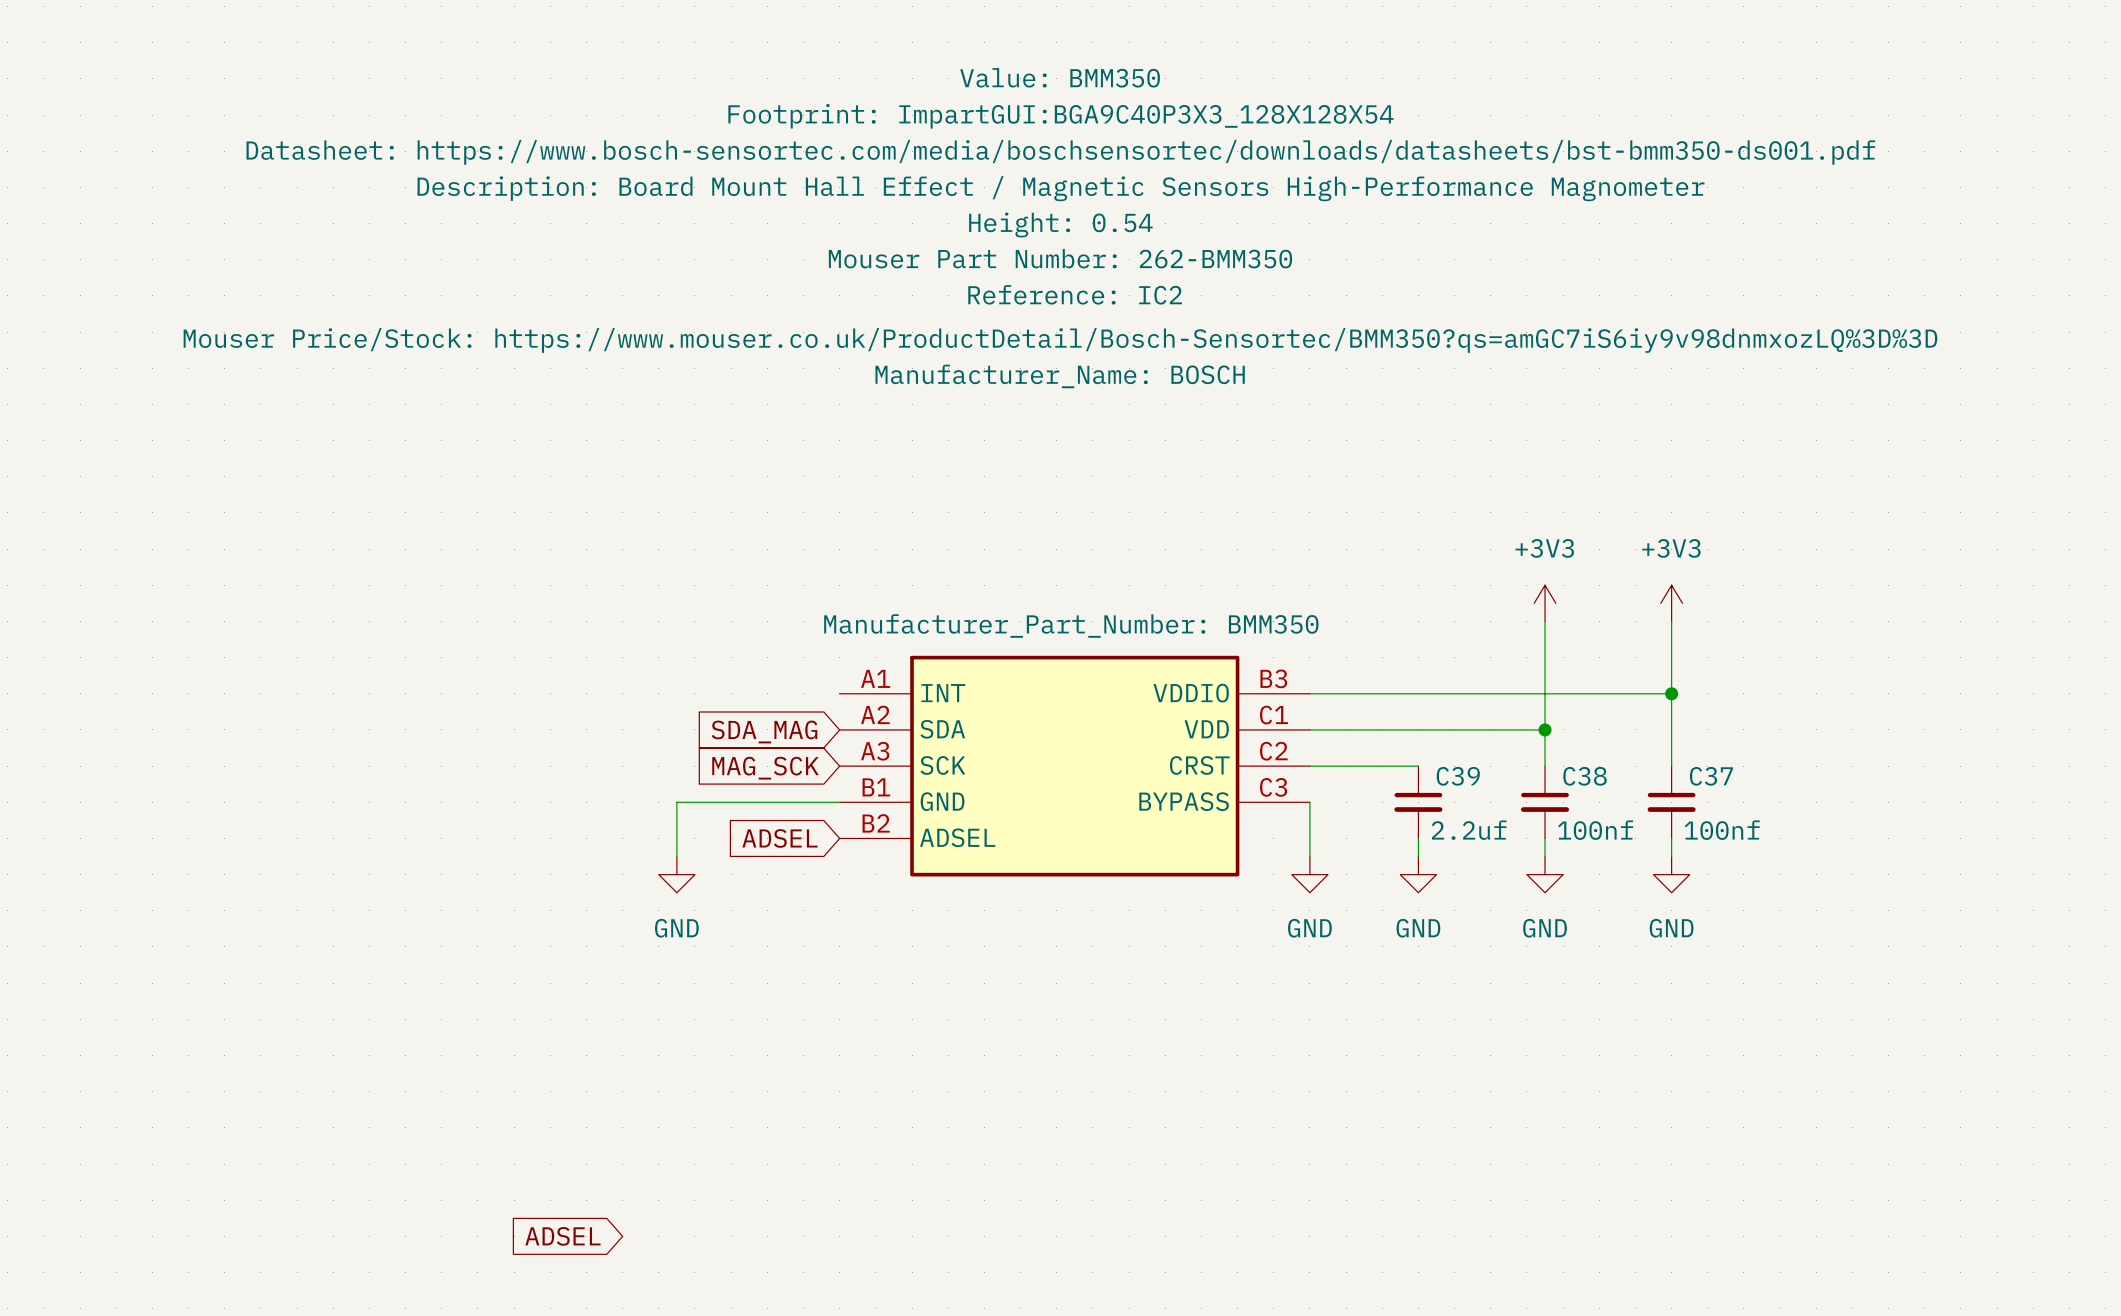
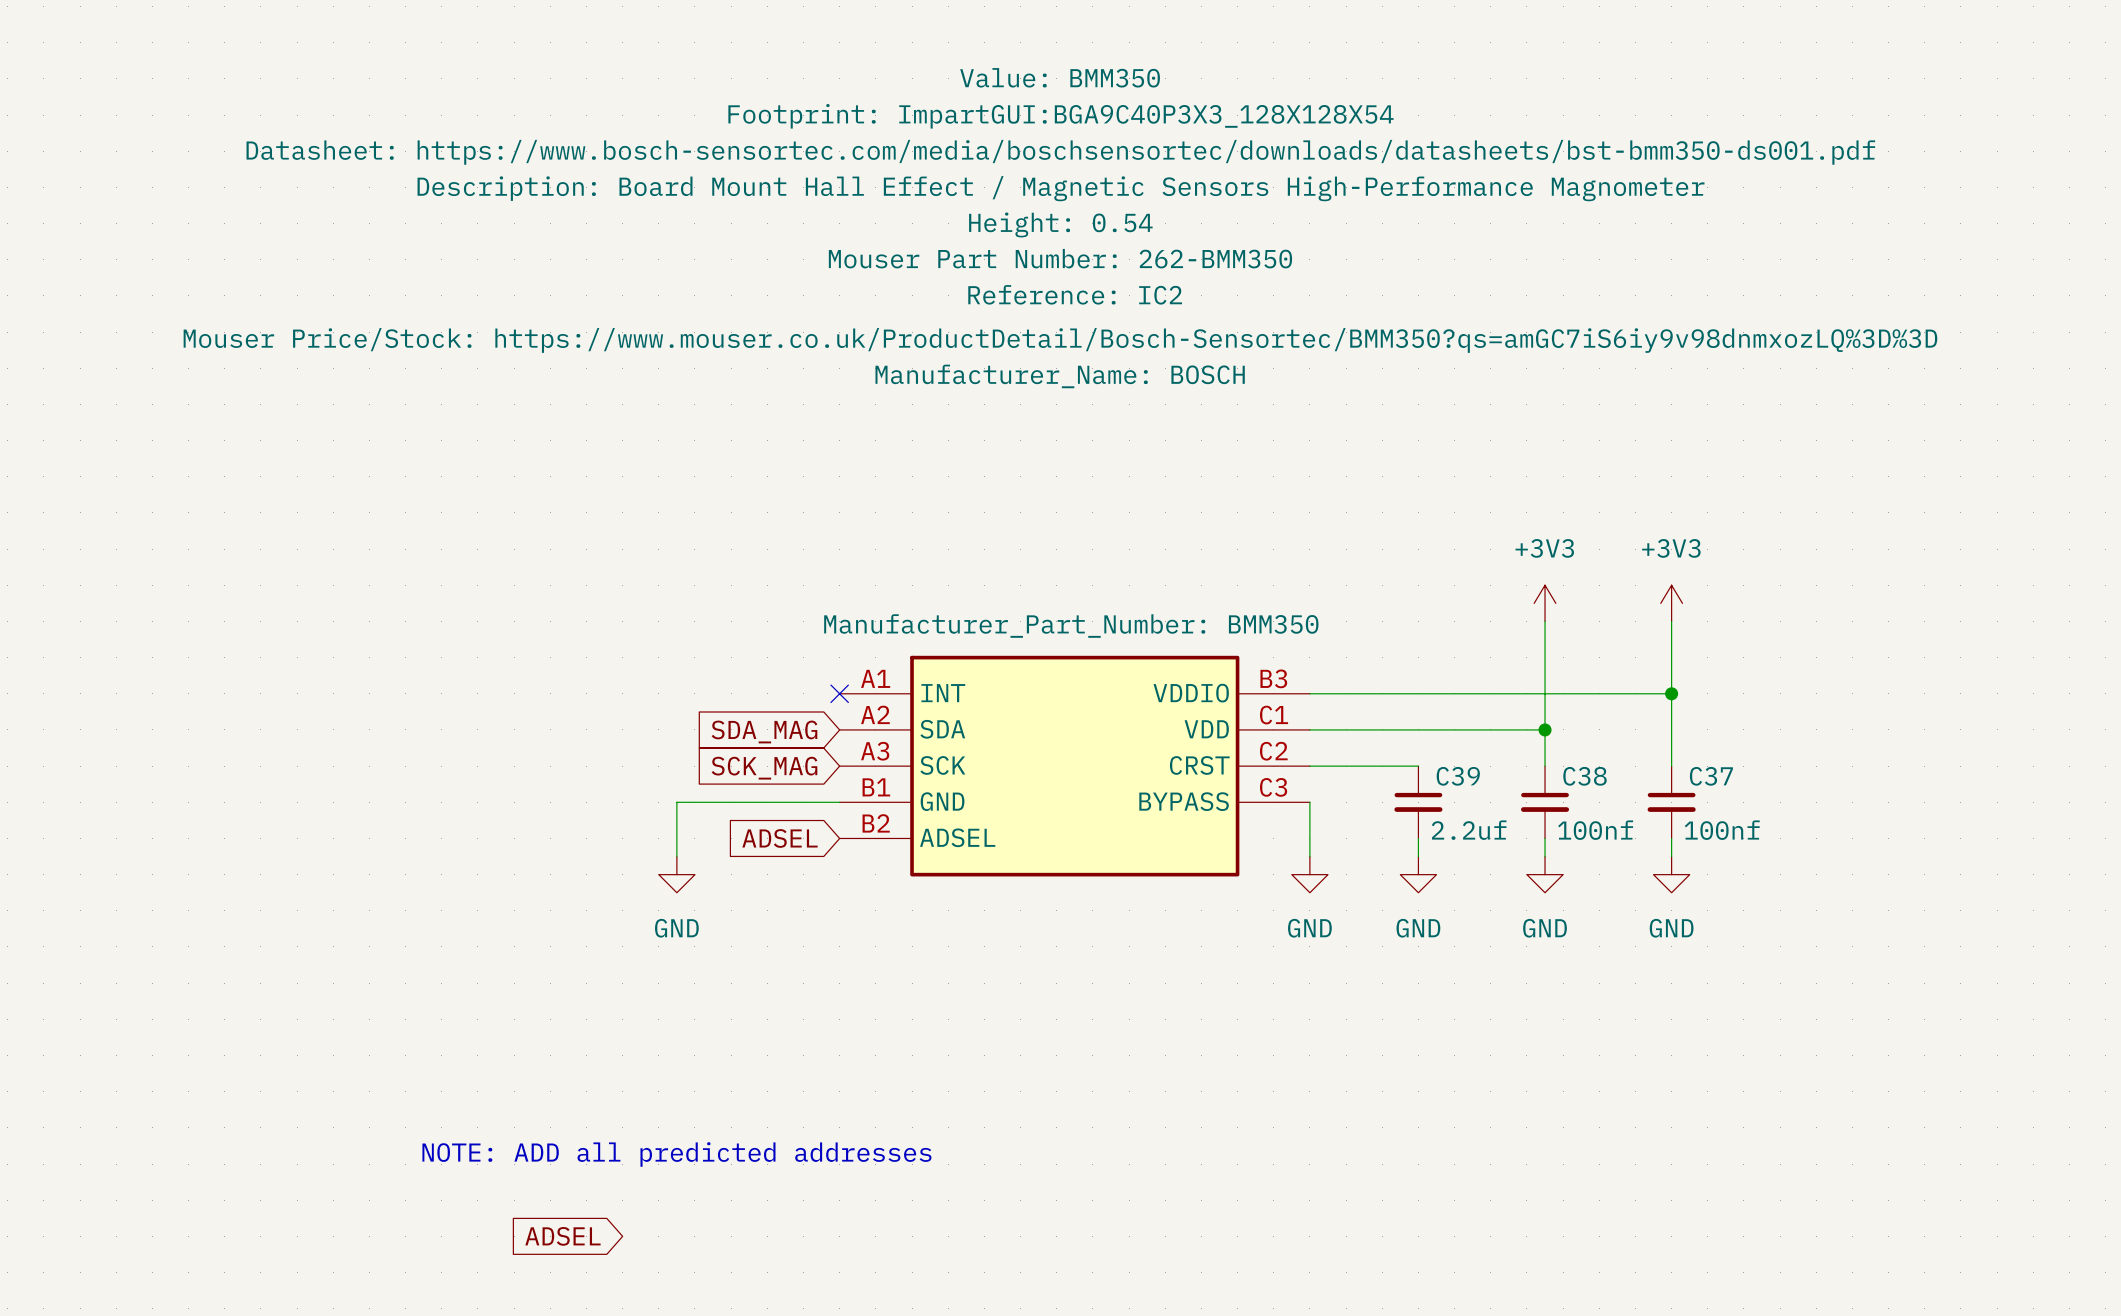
no-connect mark: none -> (839, 693)
global label: MAG_SCK (765, 768) -> SCK_MAG (764, 768)
text: none -> NOTE: ADD all predicted addresses (676, 1154)

